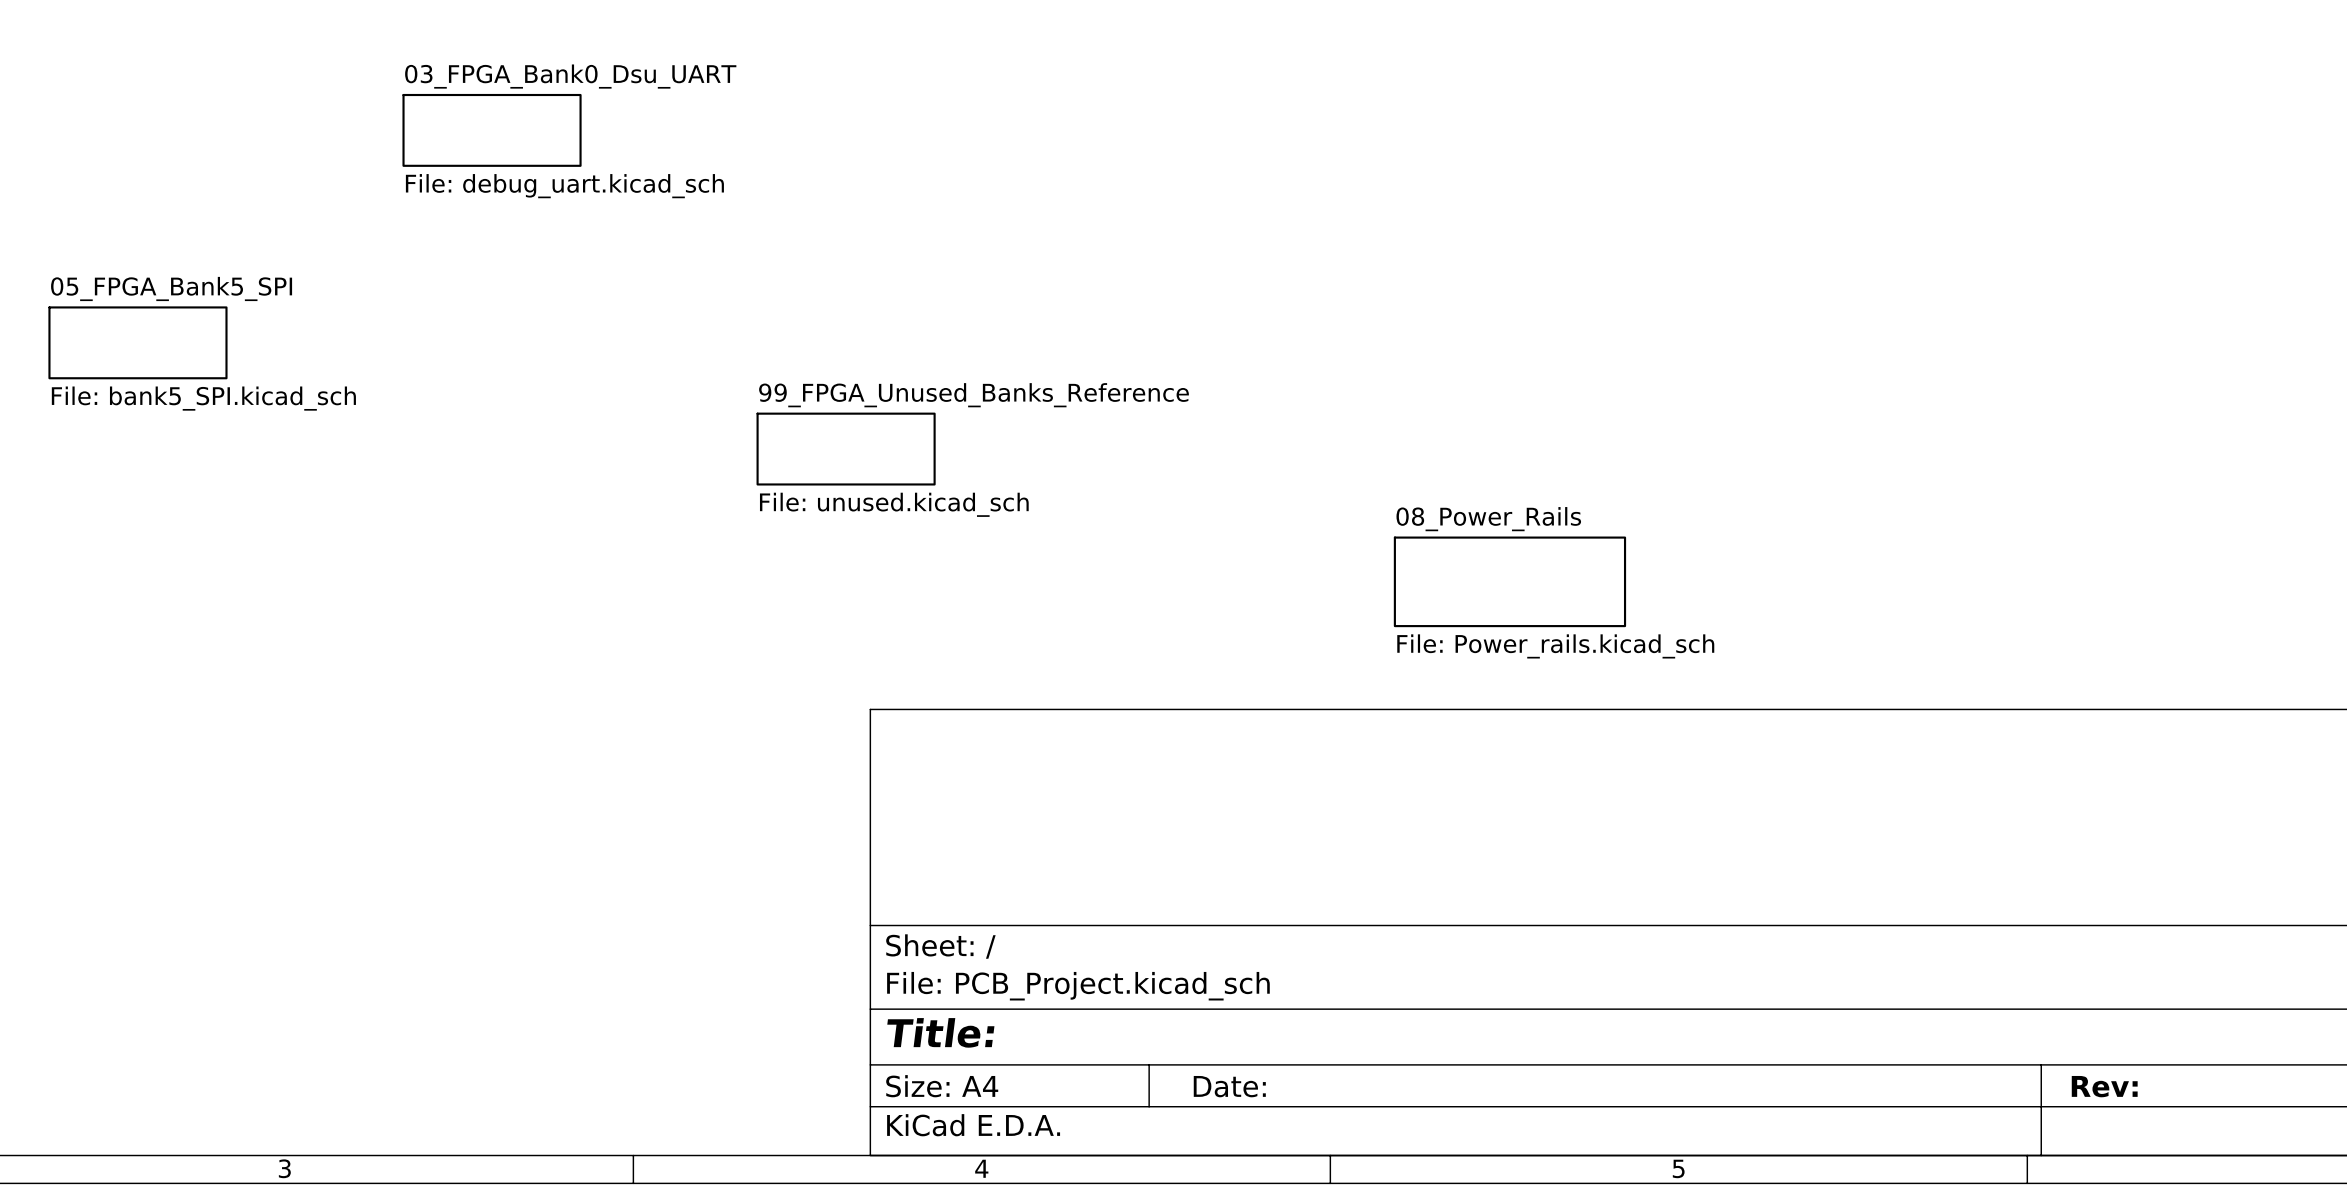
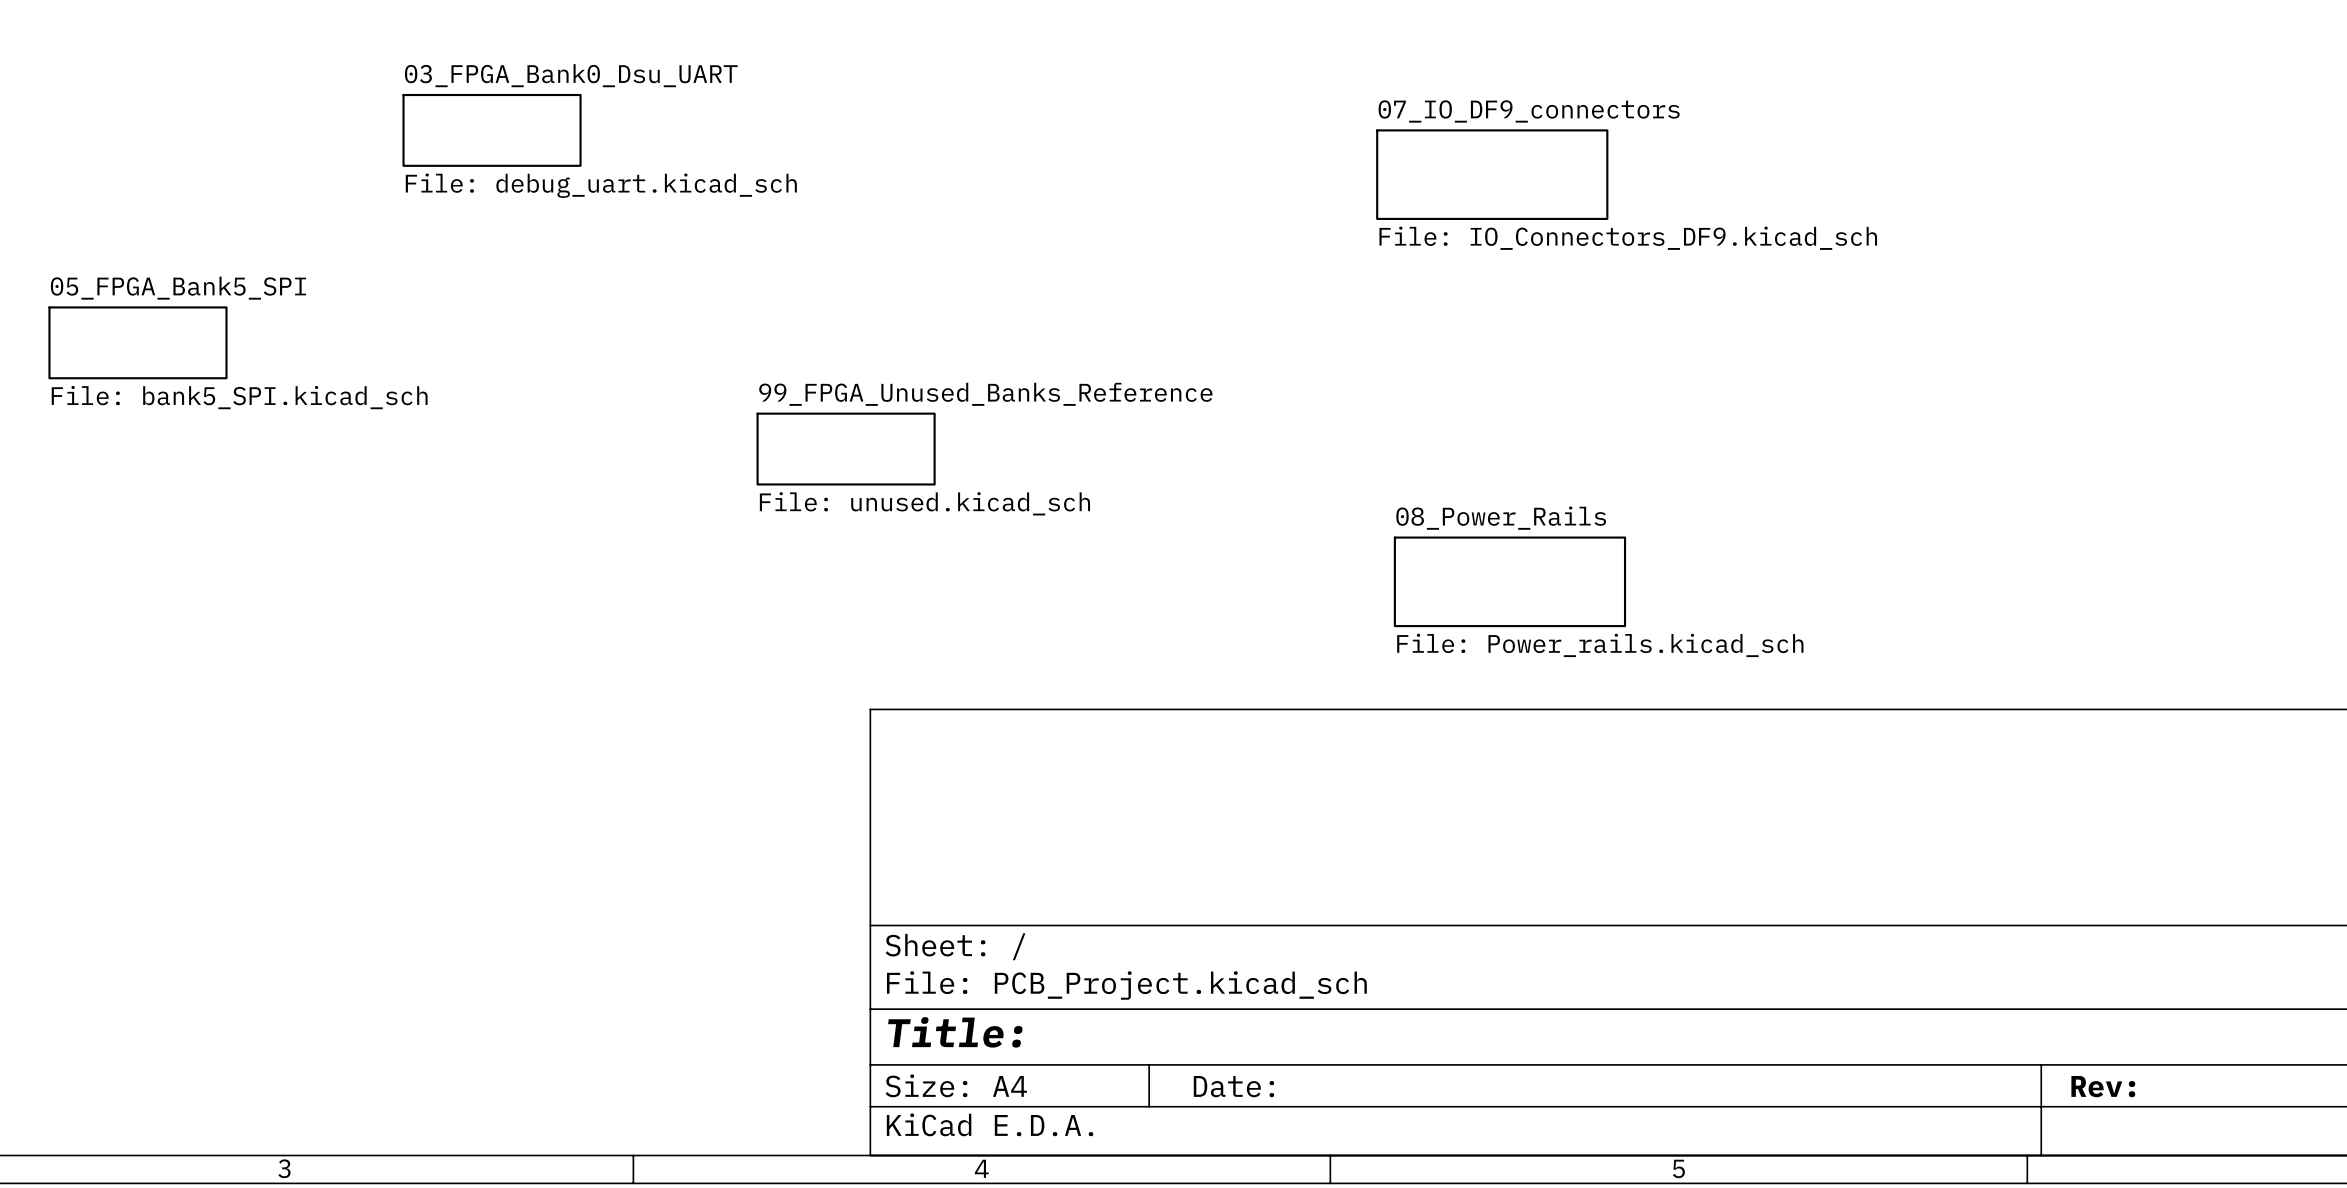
sheet 07_IO_DF9_connectors: none -> File: IO_Connectors_DF9.kicad_sch (1492, 174)

